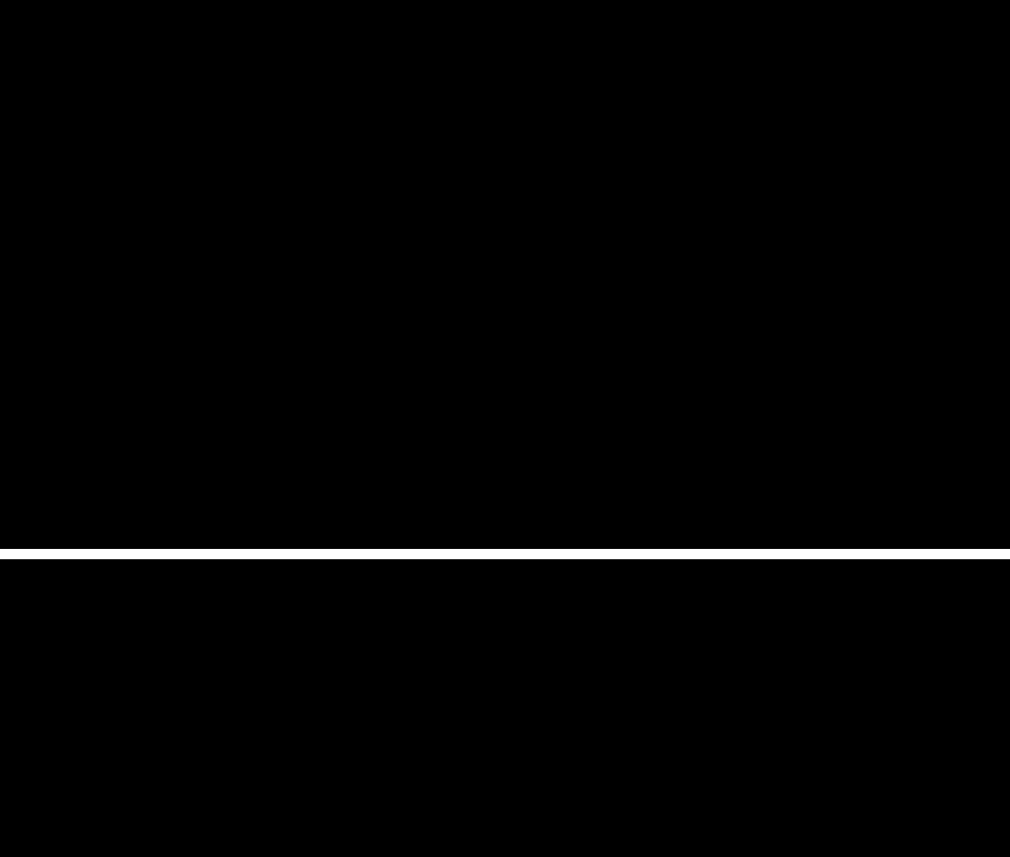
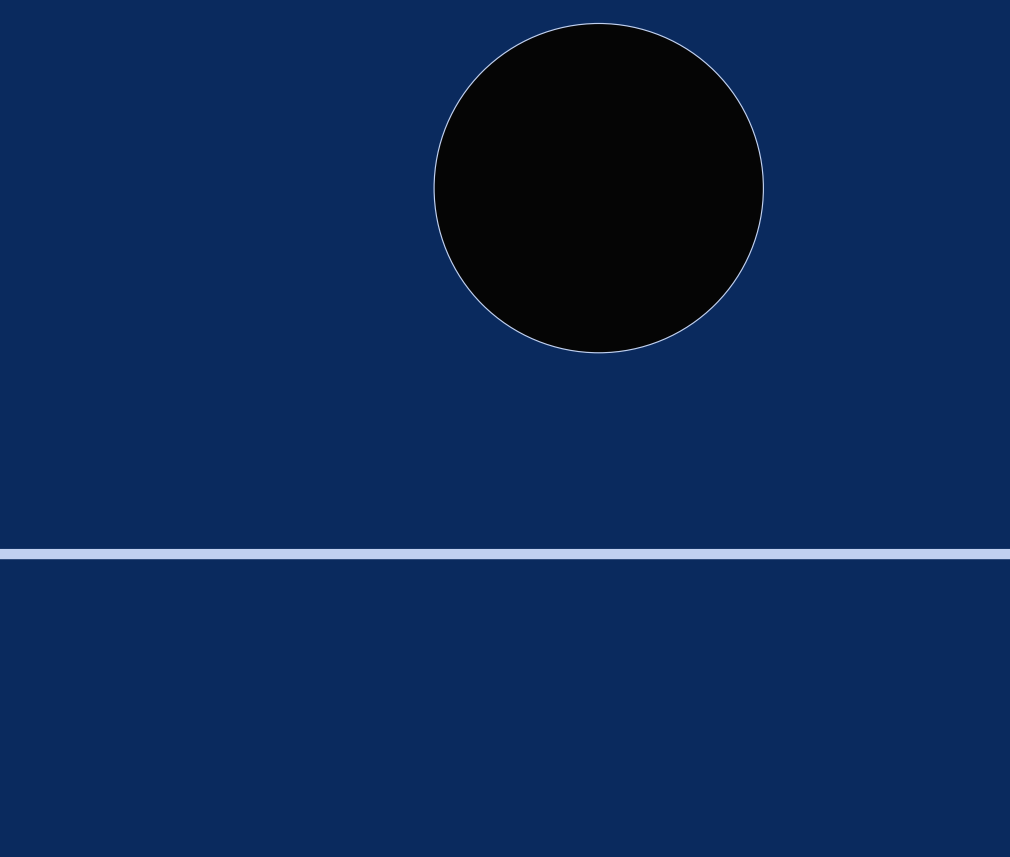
part: none -> (598, 188)

